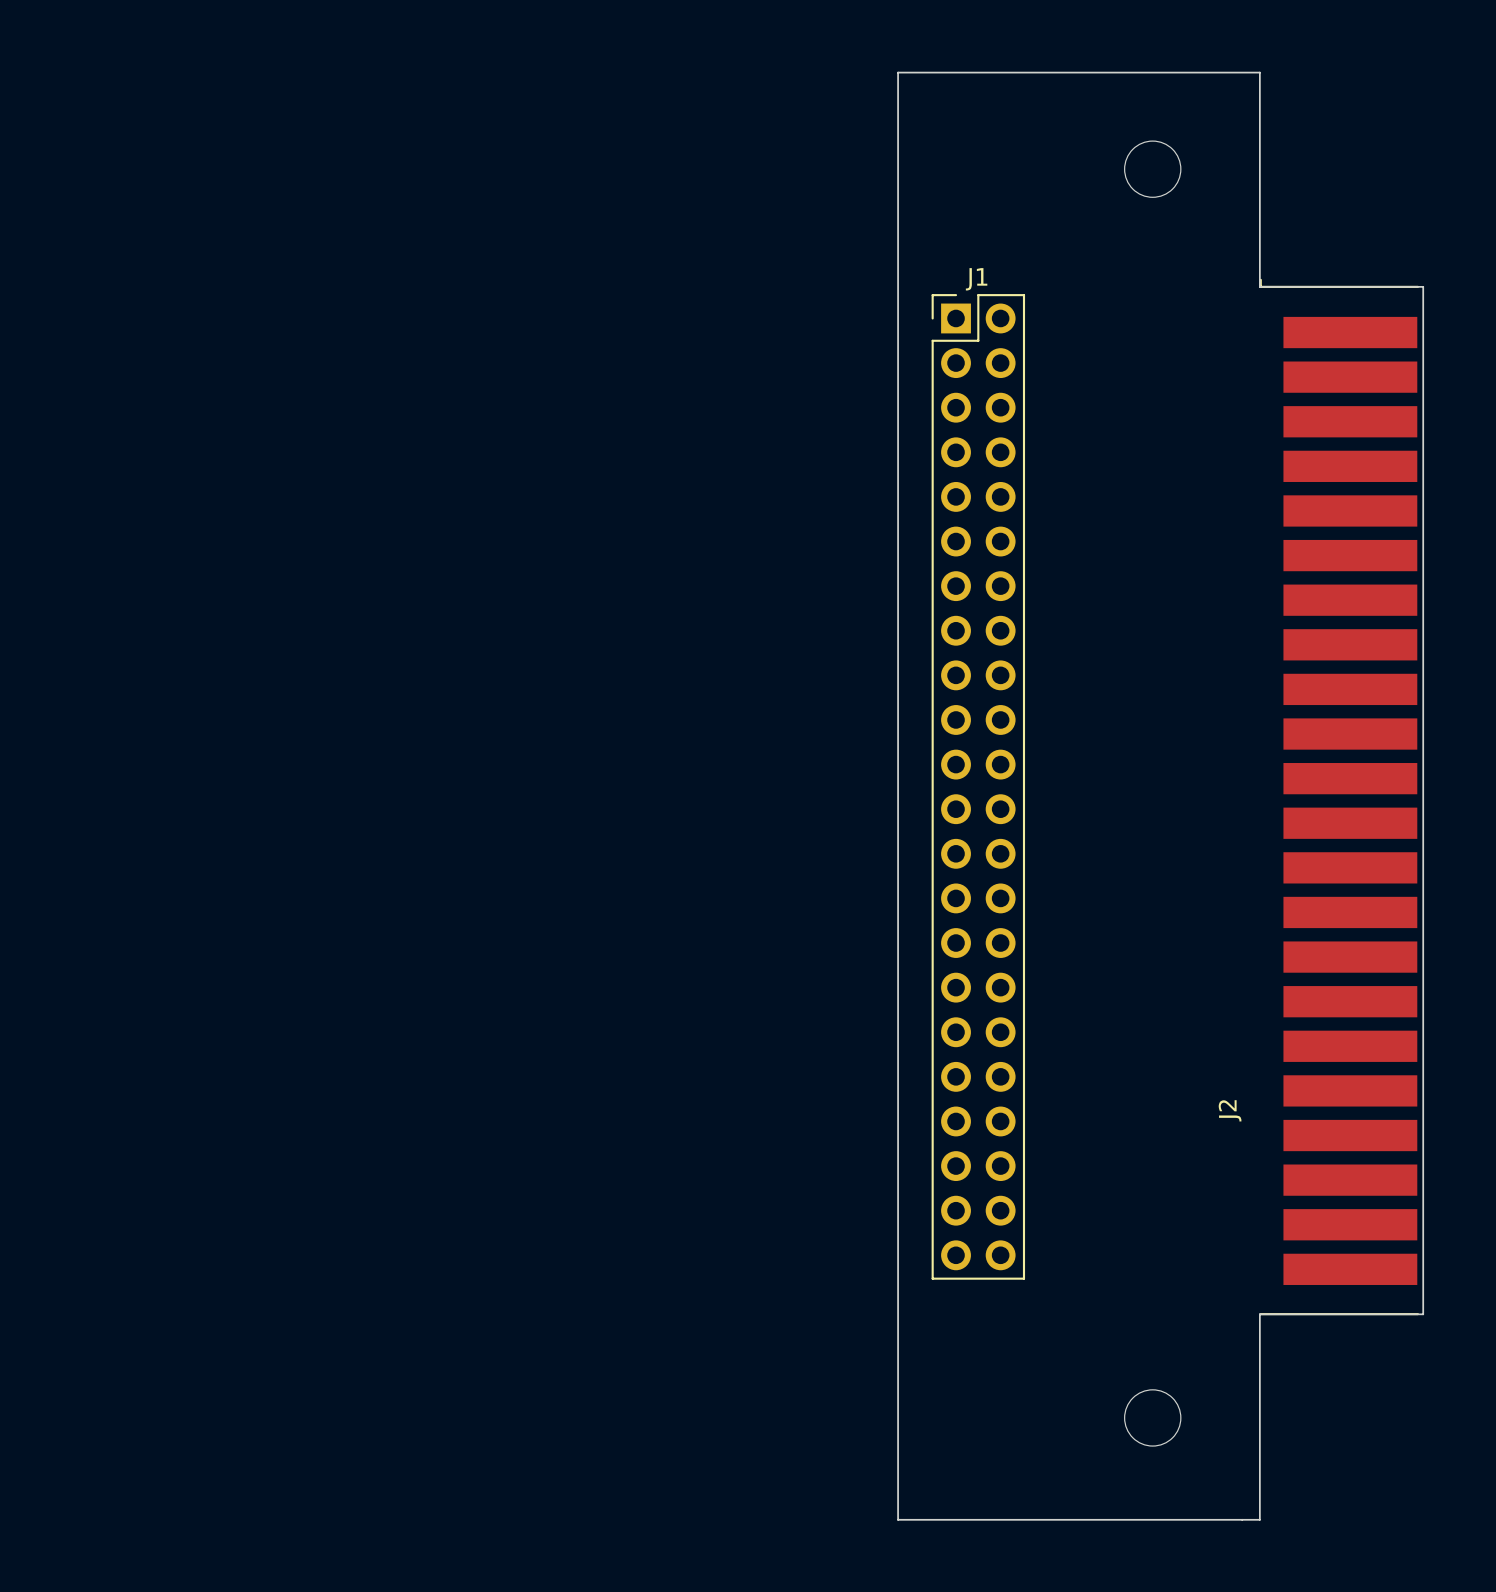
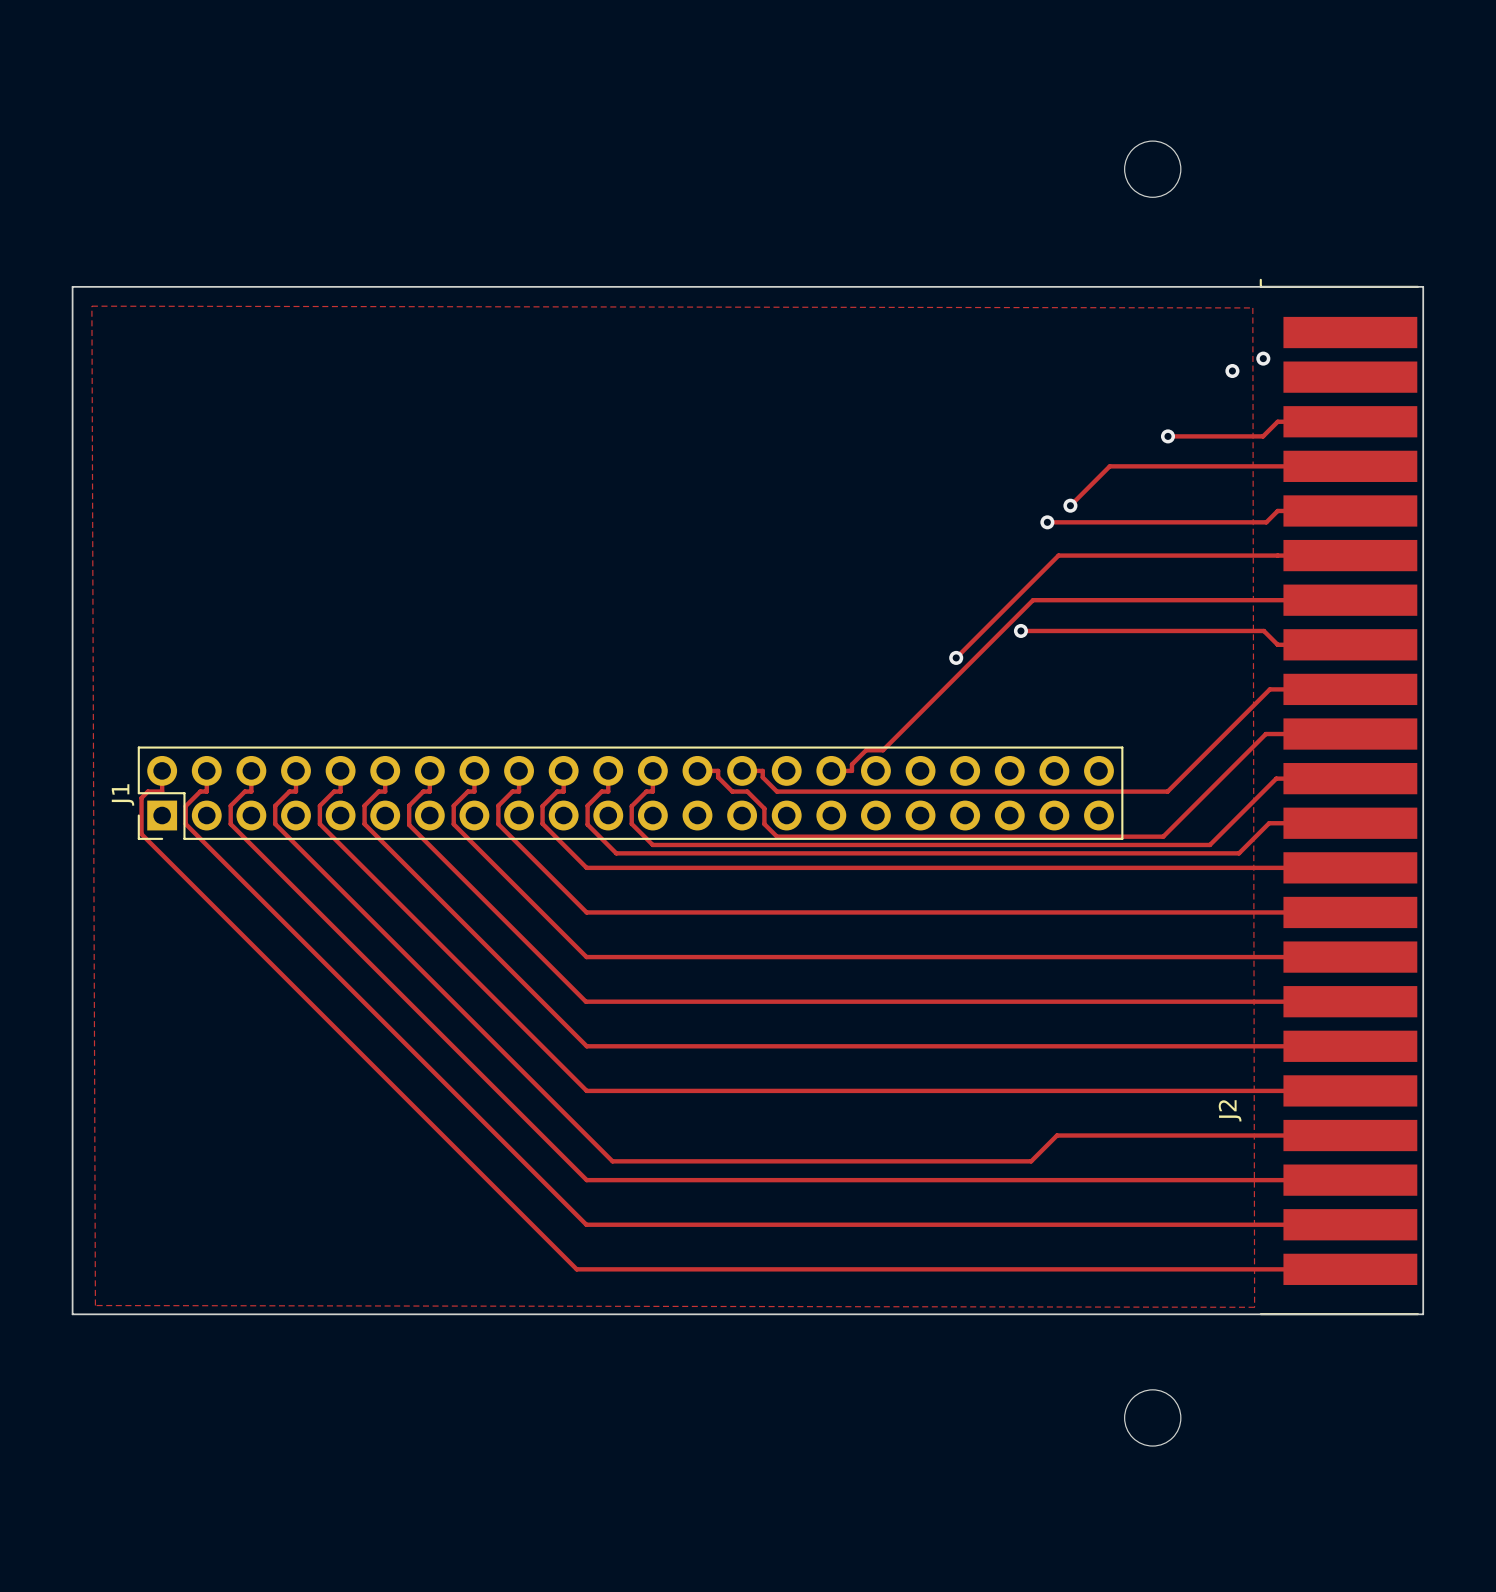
board edge: (1259, 286) (1259, 72) (898, 72) (898, 1519) (1259, 1519) (1259, 1314) -> (1259, 286) (72, 286) (72, 1314) (1259, 1314)
zone outline: none -> (91, 306) (95, 1305) (1254, 1307) (1252, 307) (91, 306)
via: none -> (1263, 358)
via: none -> (1232, 371)
track: none -> (1350, 421) (1277, 421) (1263, 436) (1167, 436)
via: none -> (1167, 436)
track: none -> (1350, 466) (1109, 466) (1070, 505)
via: none -> (1070, 505)
track: none -> (1350, 510) (1277, 510) (1266, 522) (1047, 522)
via: none -> (1047, 522)
track: none -> (1350, 555) (1058, 555) (956, 657)
track: none -> (1350, 600) (1033, 600) (882, 750) (866, 750) (851, 764) (851, 770) (831, 770)
track: none -> (1020, 630) (1263, 630) (1277, 644) (1350, 644)
via: none -> (1020, 630)
via: none -> (956, 657)
track: none -> (1350, 689) (1269, 689) (1167, 791) (776, 791) (762, 777) (762, 770) (742, 770)
track: none -> (1350, 734) (1265, 734) (1163, 836) (776, 836) (764, 824) (764, 808) (747, 791) (732, 791) (718, 777) (718, 770) (697, 770)
track: none -> (162, 770) (162, 791) (147, 791) (141, 798) (141, 834) (576, 1269) (1350, 1269)
track: none -> (206, 770) (206, 791) (200, 791) (185, 806) (185, 824) (586, 1224) (1350, 1224)
track: none -> (251, 770) (251, 791) (244, 791) (230, 805) (230, 824) (586, 1180) (1350, 1180)
track: none -> (295, 770) (295, 791) (289, 791) (275, 805) (275, 824) (612, 1161) (1031, 1161) (1057, 1135) (1350, 1135)
track: none -> (340, 770) (340, 791) (334, 791) (319, 805) (319, 824) (586, 1090) (1350, 1090)
track: none -> (385, 770) (385, 791) (378, 791) (364, 805) (364, 824) (586, 1046) (1350, 1046)
track: none -> (429, 770) (429, 791) (423, 791) (409, 805) (409, 824) (585, 1001) (1350, 1001)
track: none -> (474, 770) (474, 791) (467, 791) (453, 805) (453, 824) (586, 957) (1350, 957)
track: none -> (519, 770) (519, 791) (512, 791) (498, 805) (498, 824) (586, 912) (1350, 912)
track: none -> (563, 770) (563, 791) (557, 791) (542, 806) (542, 823) (586, 867) (1350, 867)
track: none -> (608, 770) (608, 791) (601, 791) (587, 805) (587, 824) (616, 853) (1239, 853) (1269, 823) (1350, 823)
track: none -> (652, 770) (652, 791) (646, 791) (631, 806) (631, 823) (652, 844) (1209, 844) (1276, 778) (1350, 778)
J1 rotation: 0° (978, 786) -> 90° counterclockwise (630, 793)

